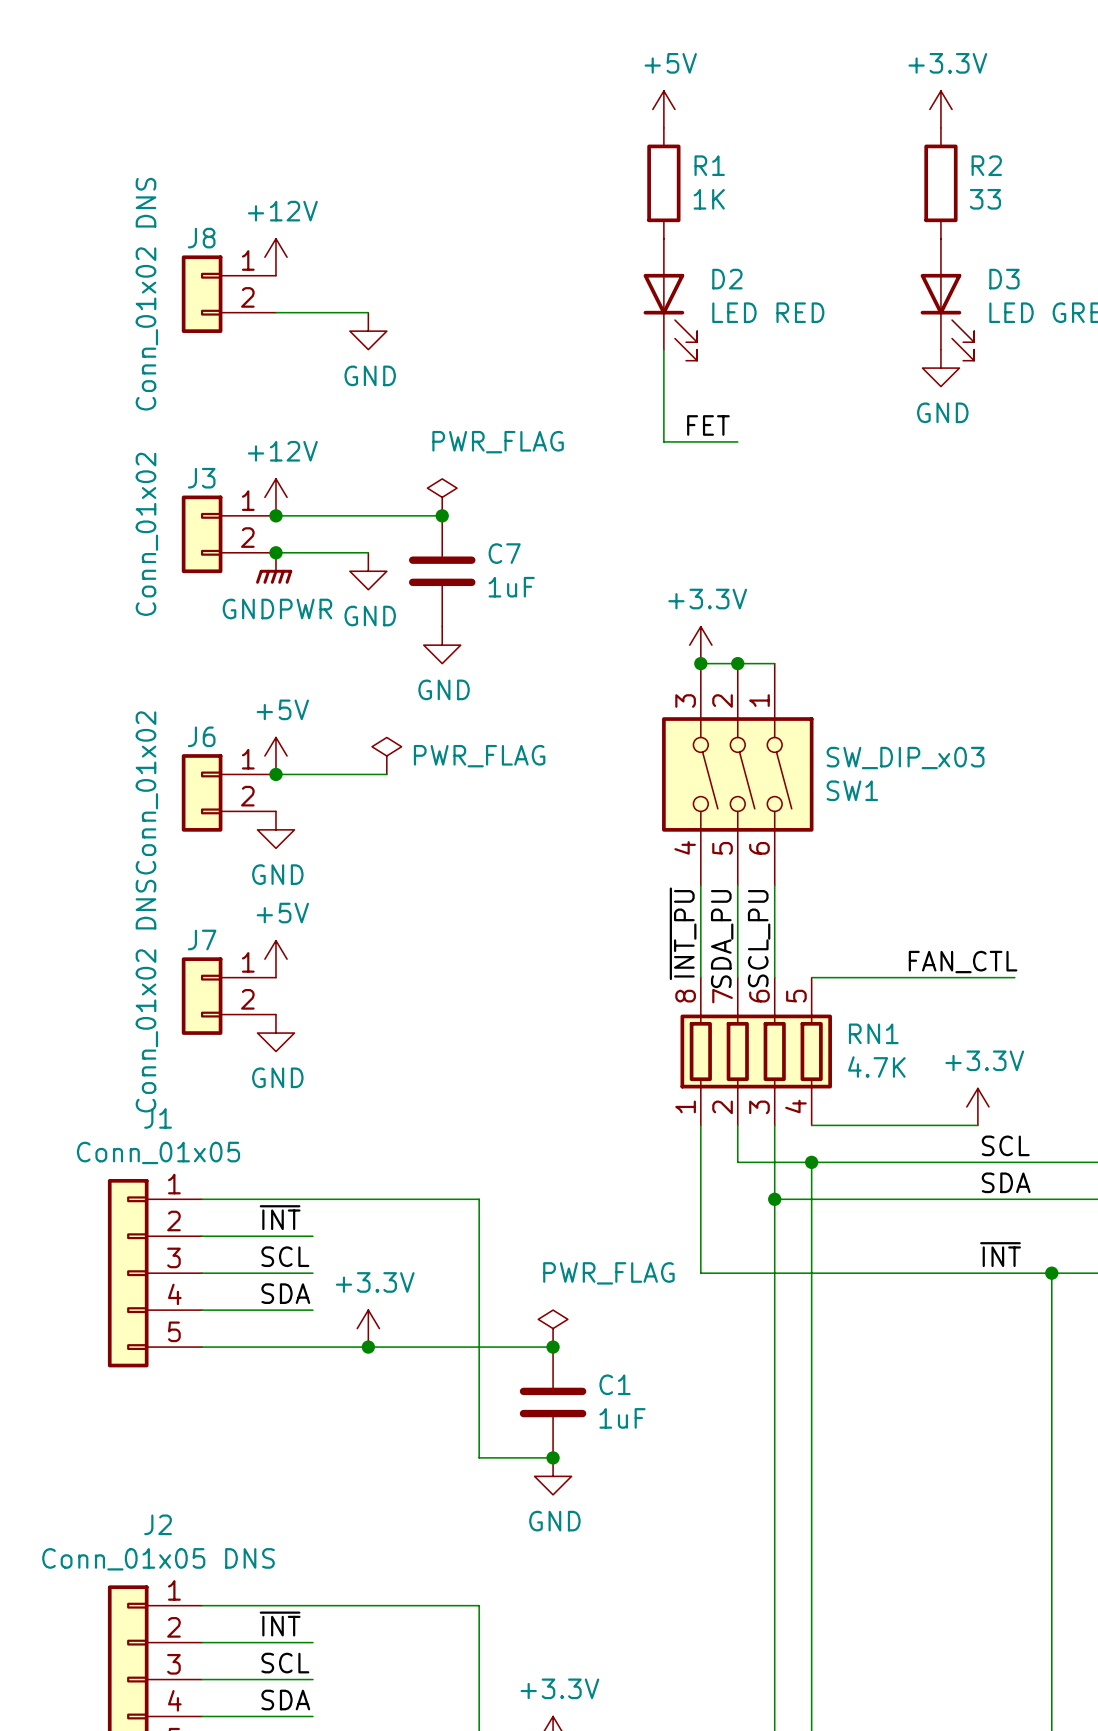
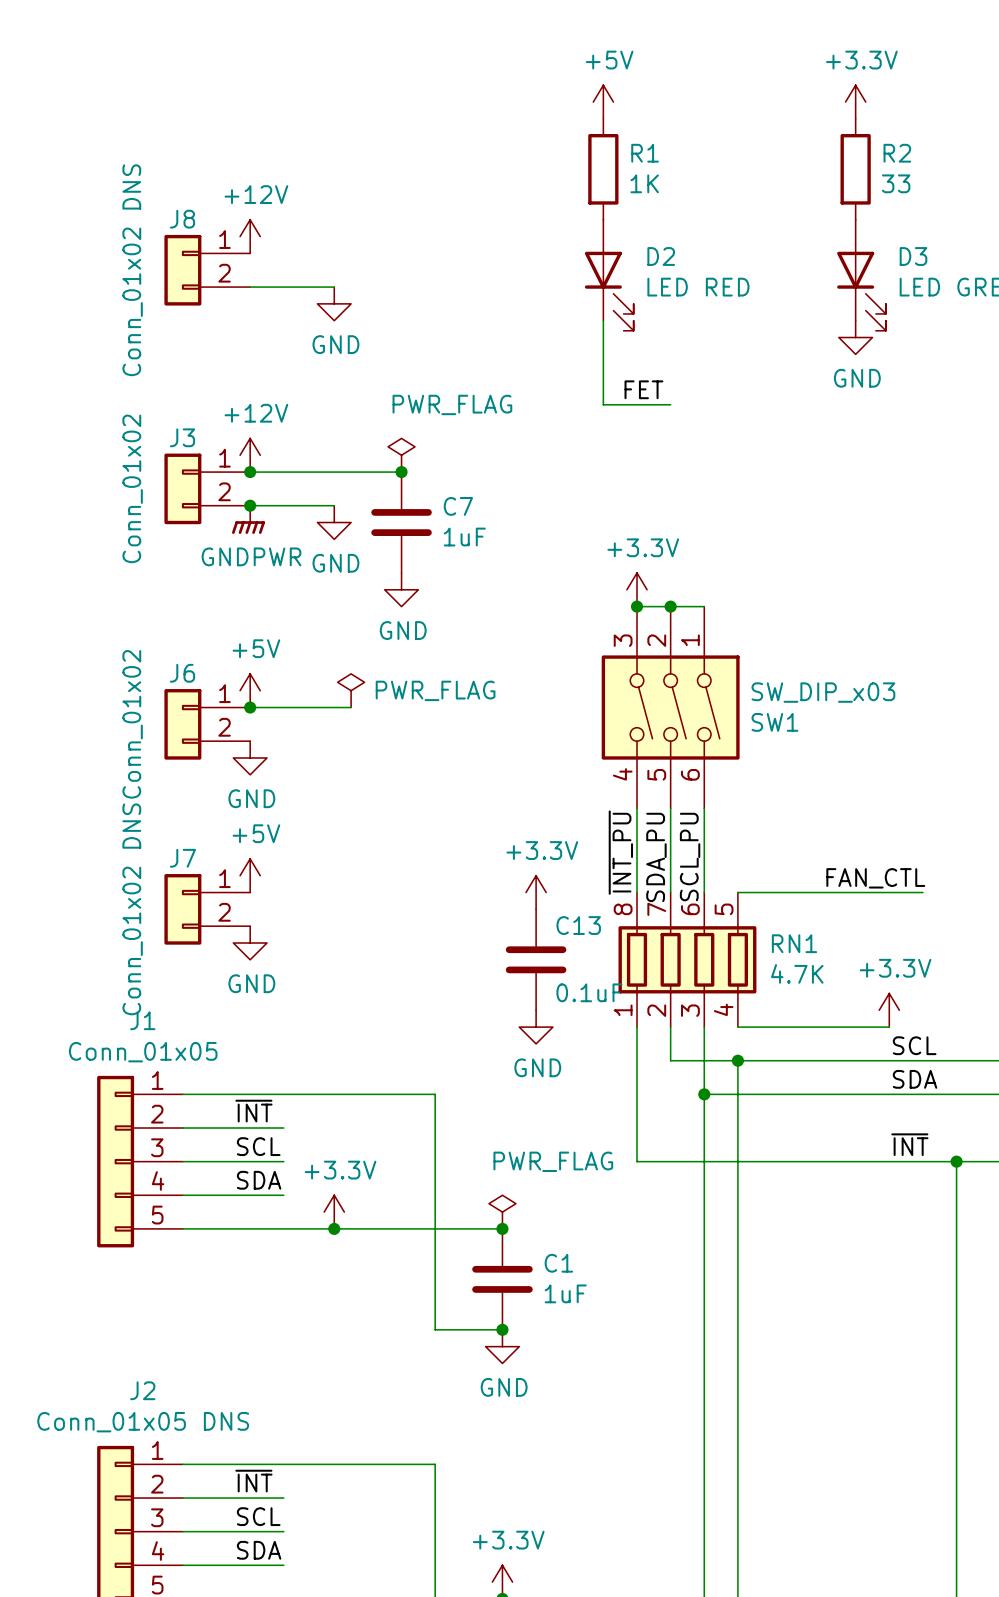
power symbol: none -> +3.3V (536, 892)
C13: none -> 0.1uF (536, 959)
power symbol: none -> GND (536, 1027)

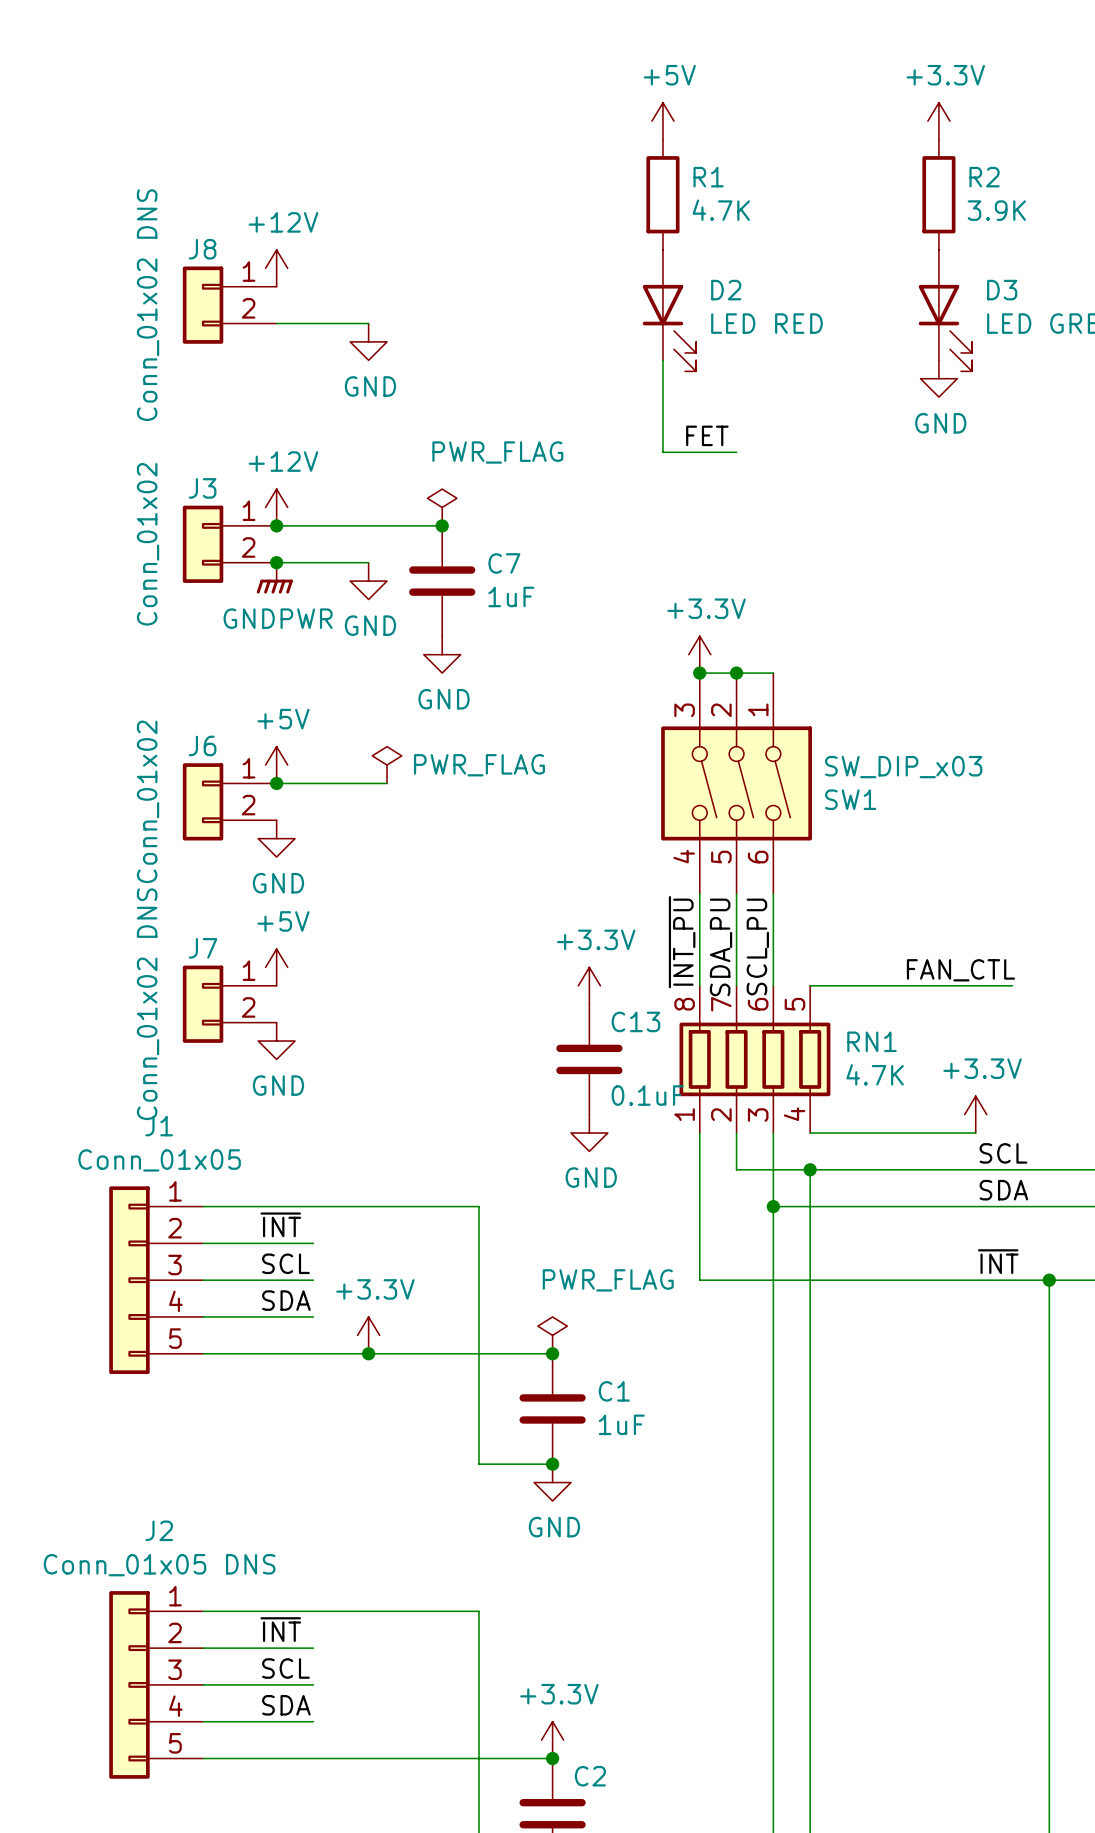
R1 value: 1K (644, 183) -> 4.7K (721, 210)
R2 value: 33 (896, 183) -> 3.9K (996, 210)

